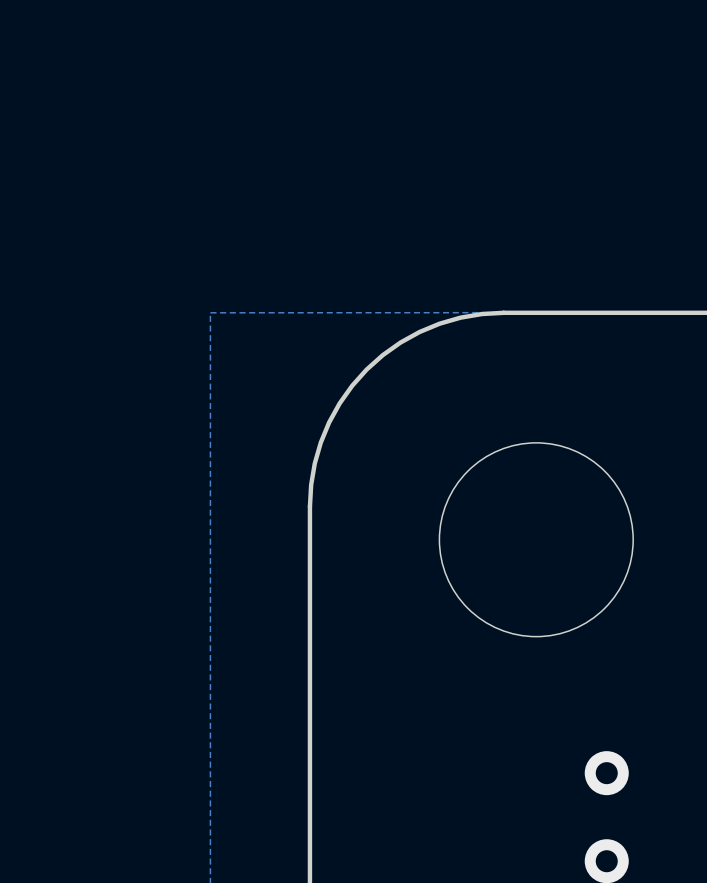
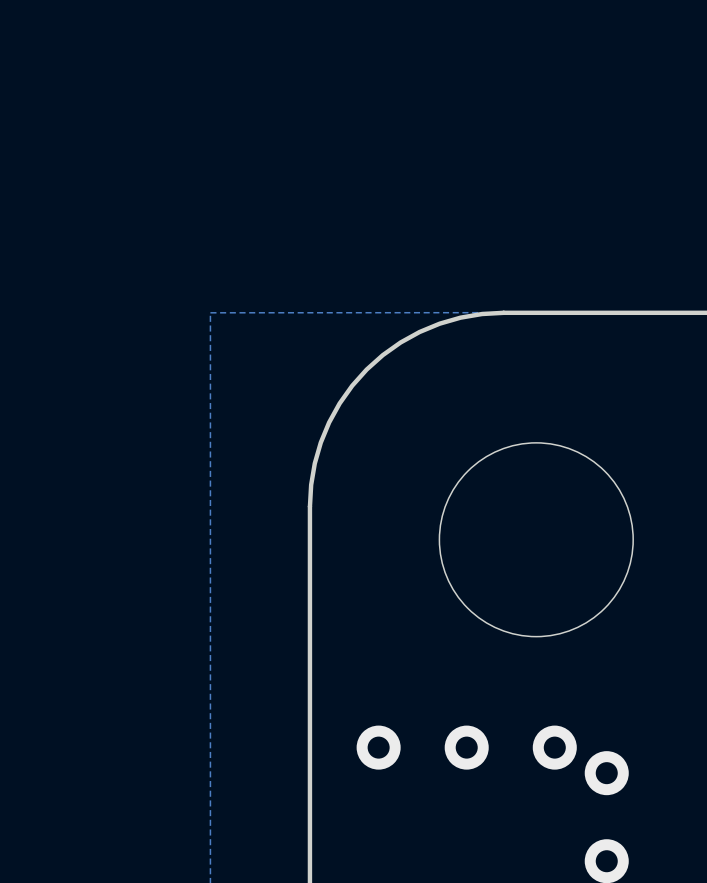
via: none -> (378, 747)
via: none -> (466, 747)
via: none -> (554, 747)

